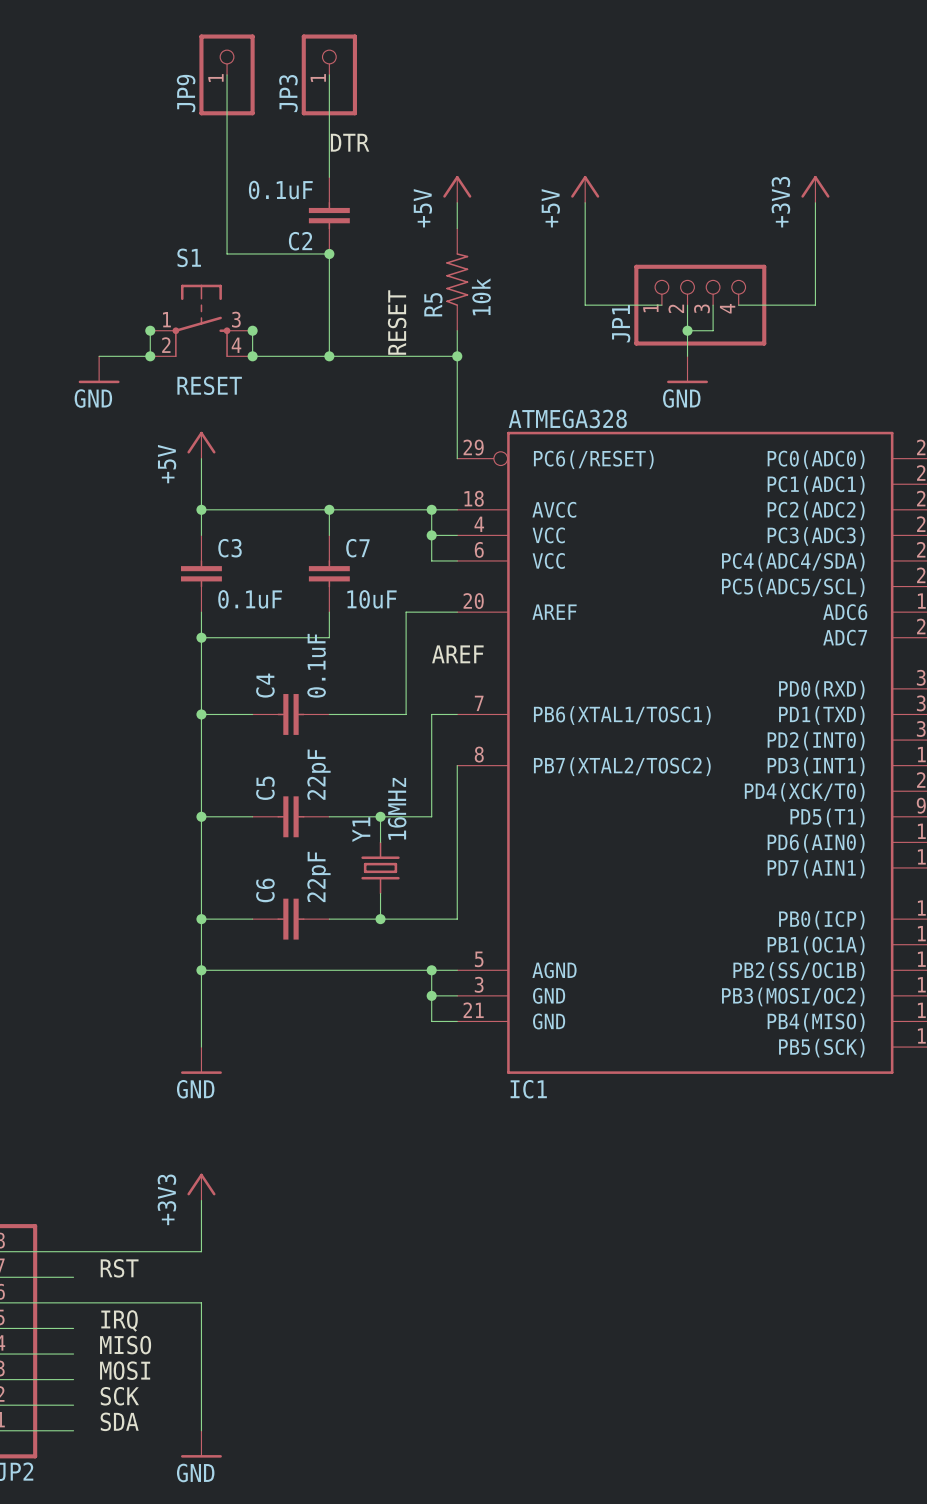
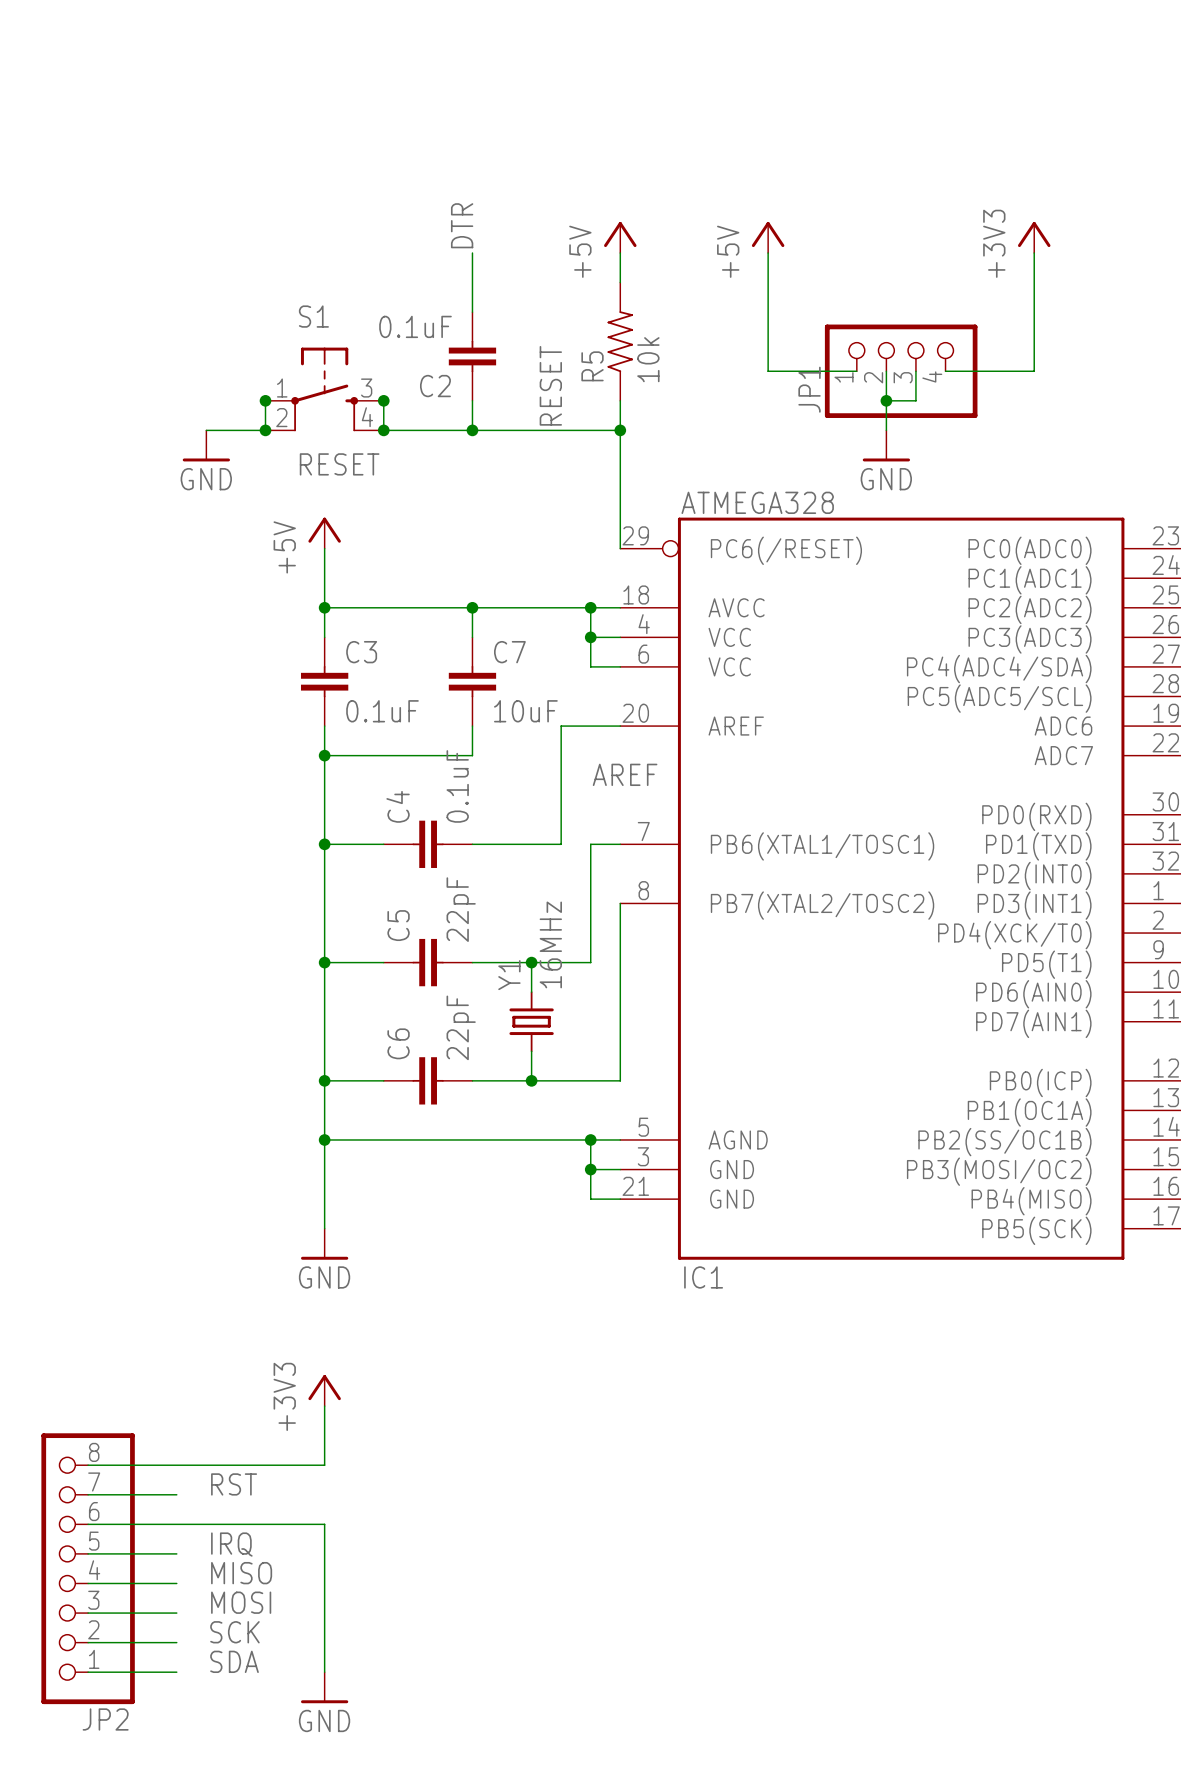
wire: (227, 74) (227, 253) (329, 253) (329, 330) -> none
JP9: (227, 74) -> none
wire: (329, 74) (329, 177) -> none
JP3: (329, 74) -> none
label rotation: 0° (350, 142) -> 90° counterclockwise (462, 225)
C2 position: (329, 215) -> (472, 356)
junction: (329, 253) -> none

